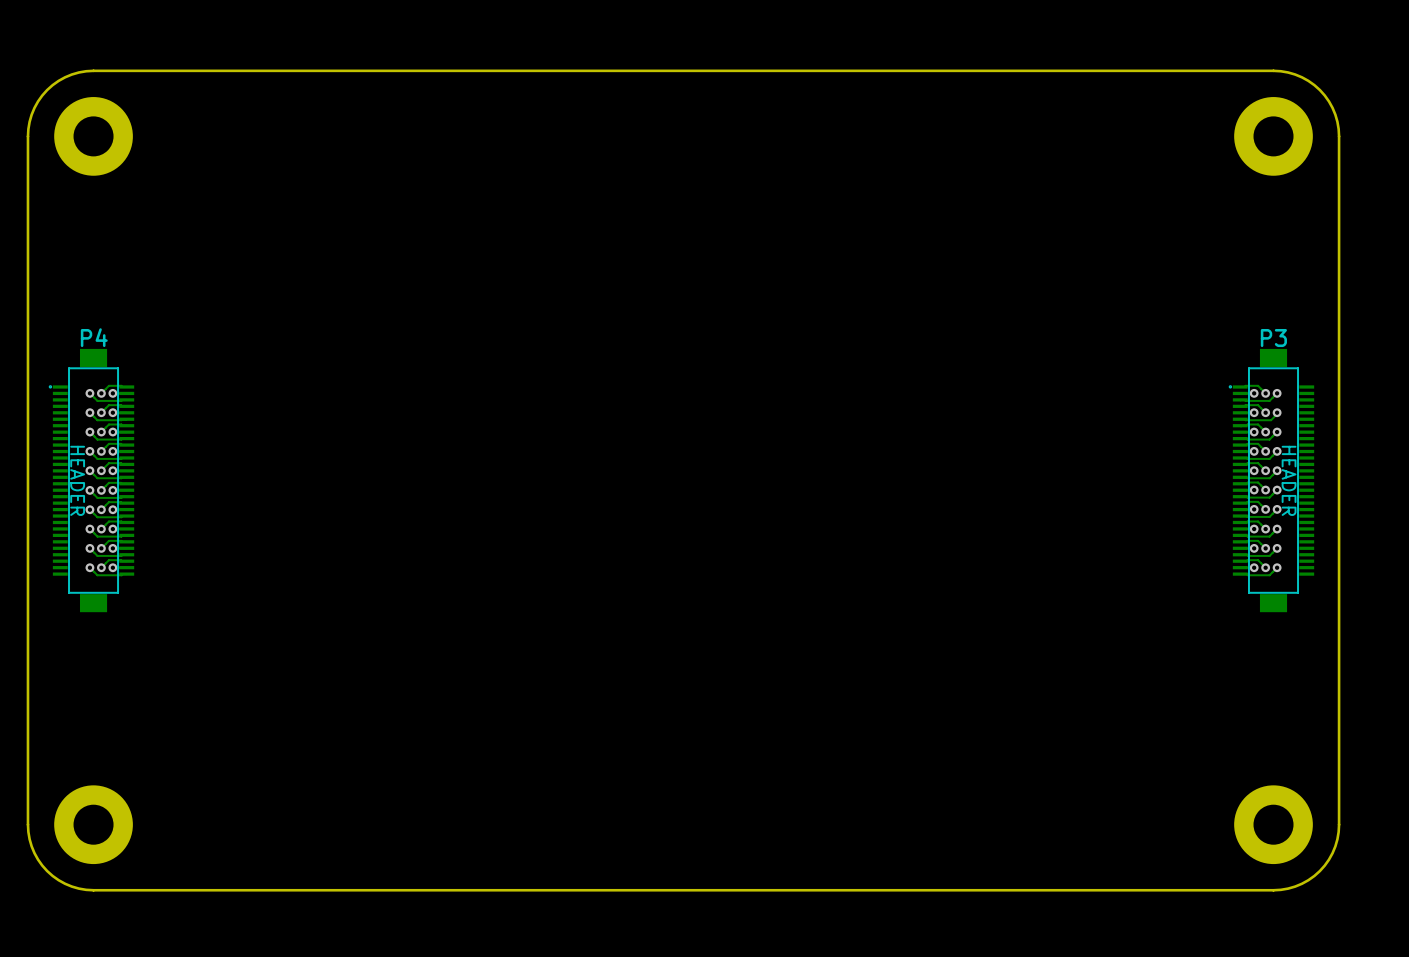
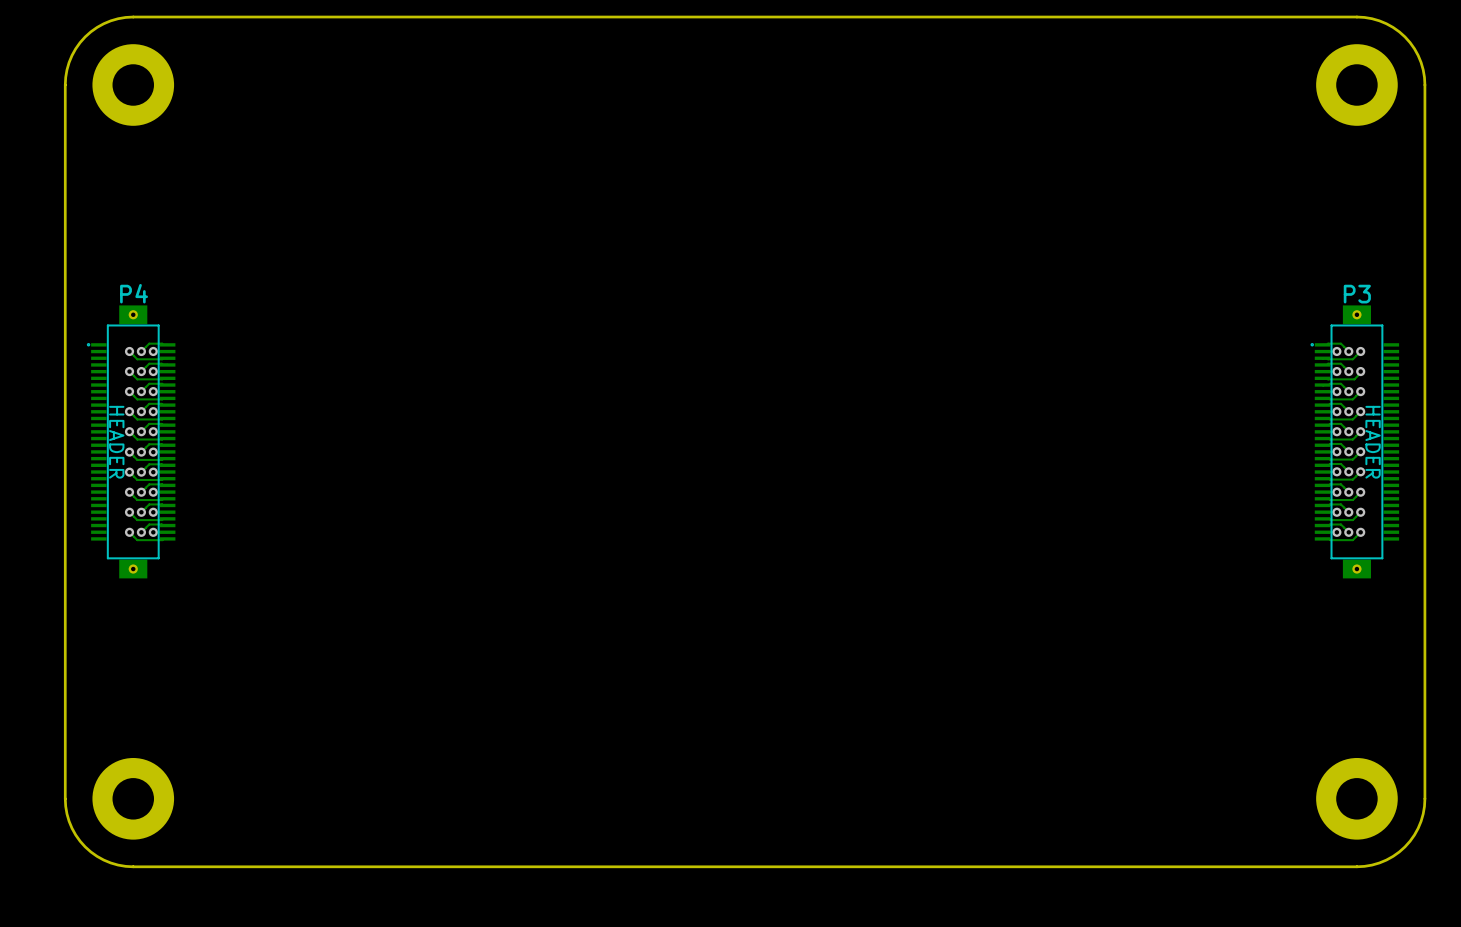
part: none -> (133, 314)
part: none -> (1356, 314)
part: none -> (133, 569)
part: none -> (1356, 569)

